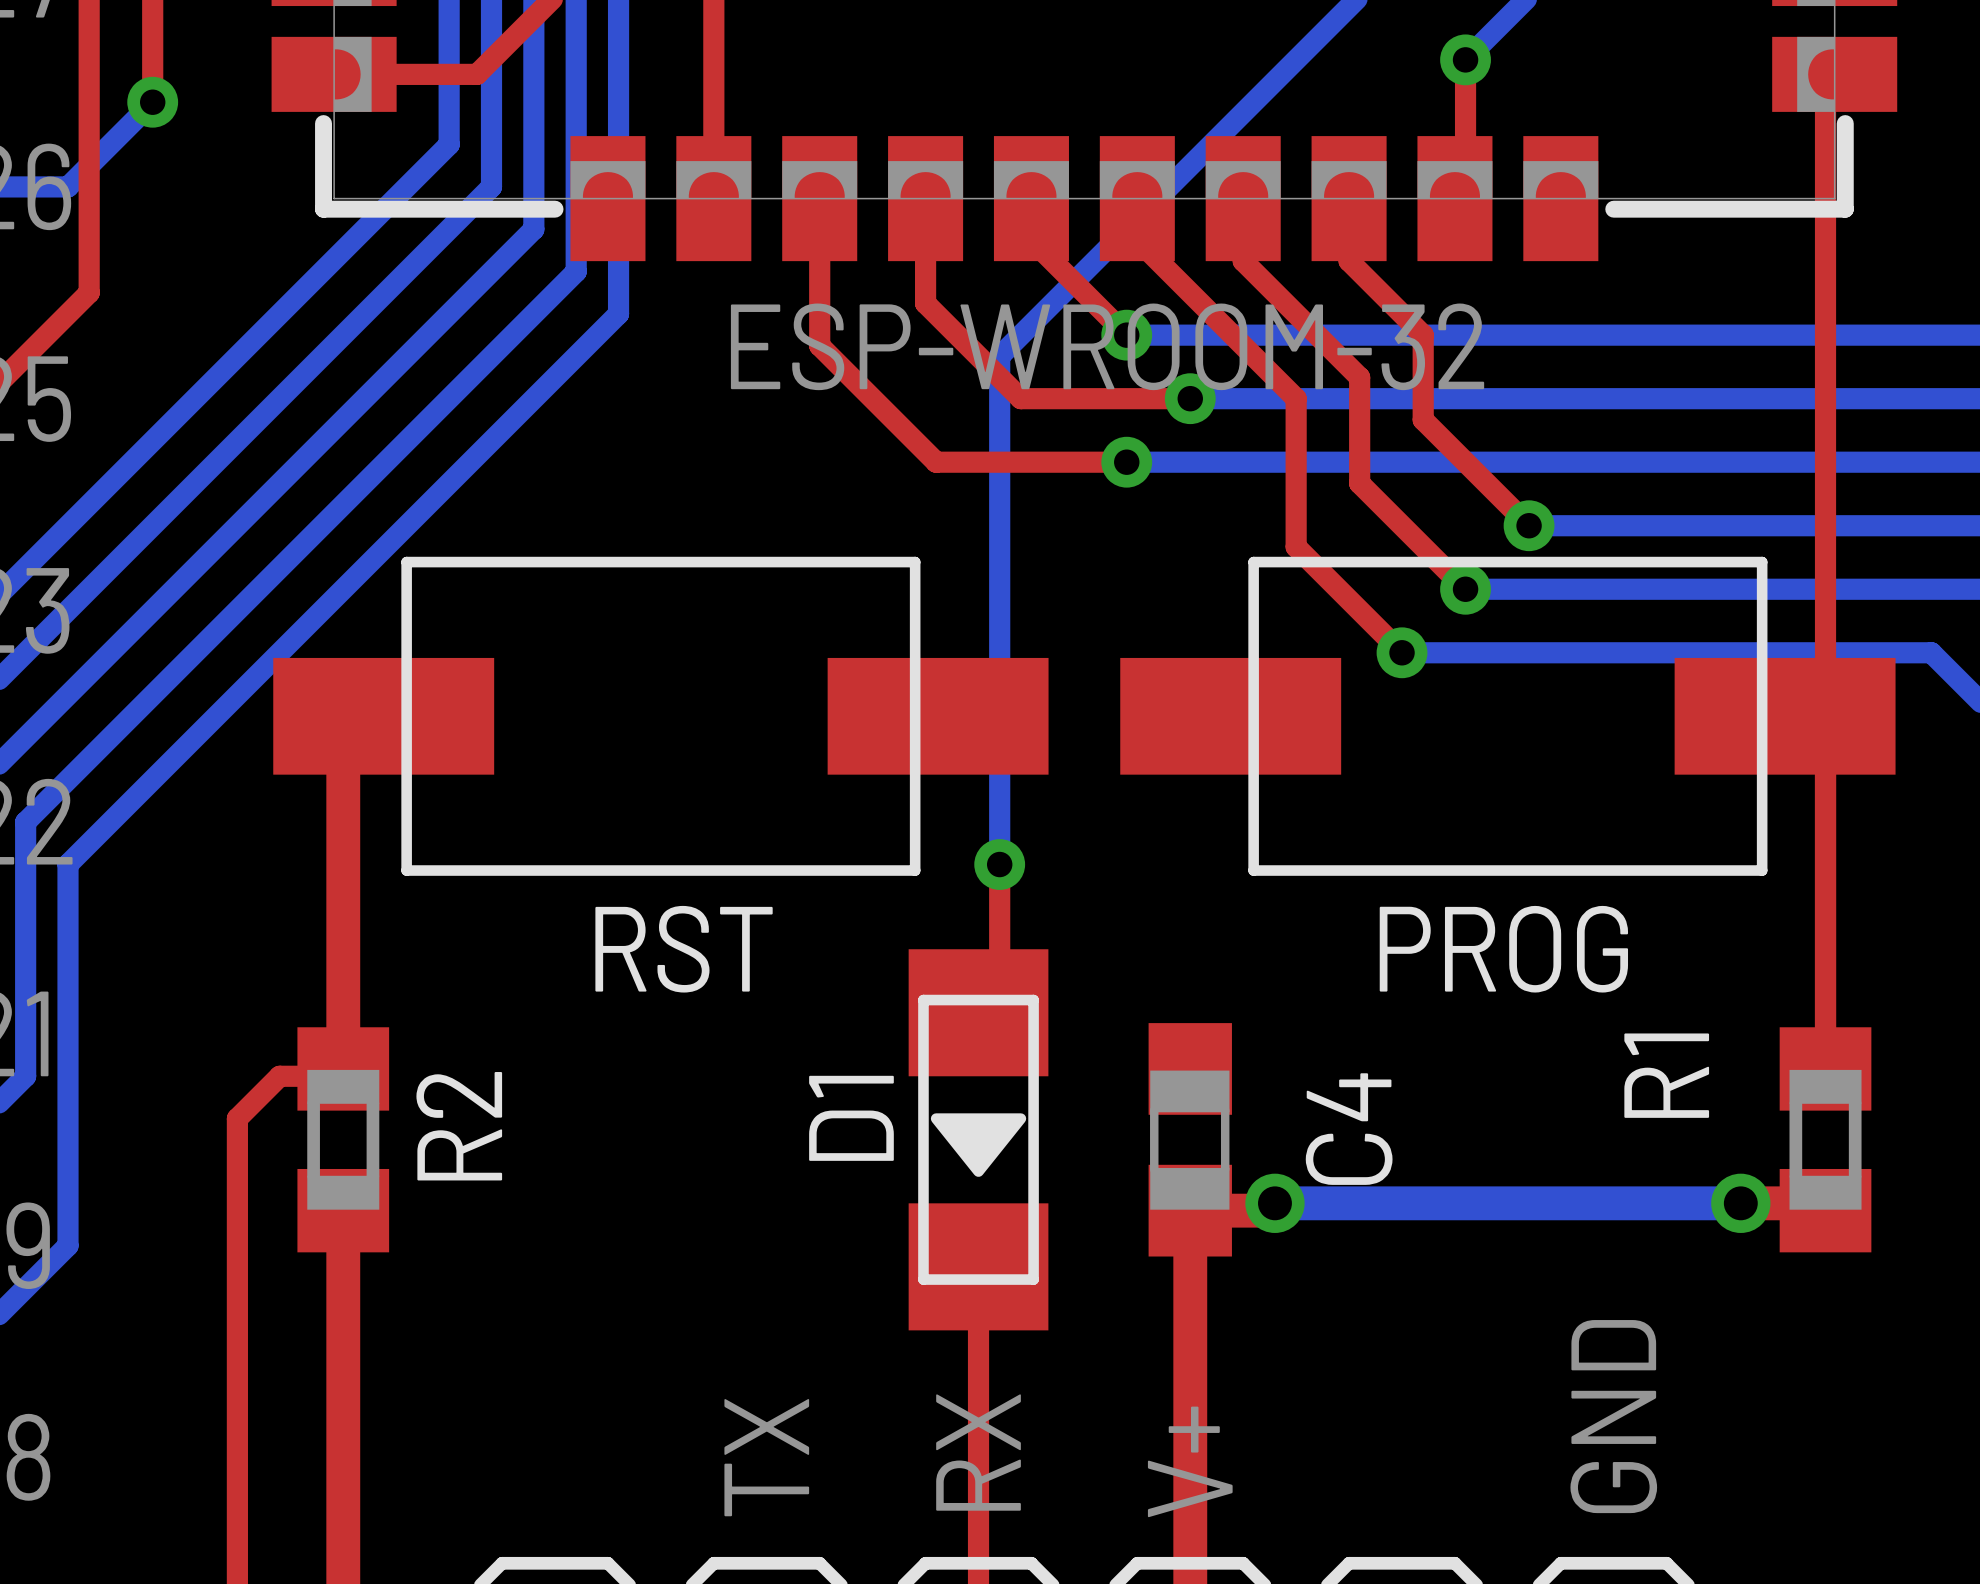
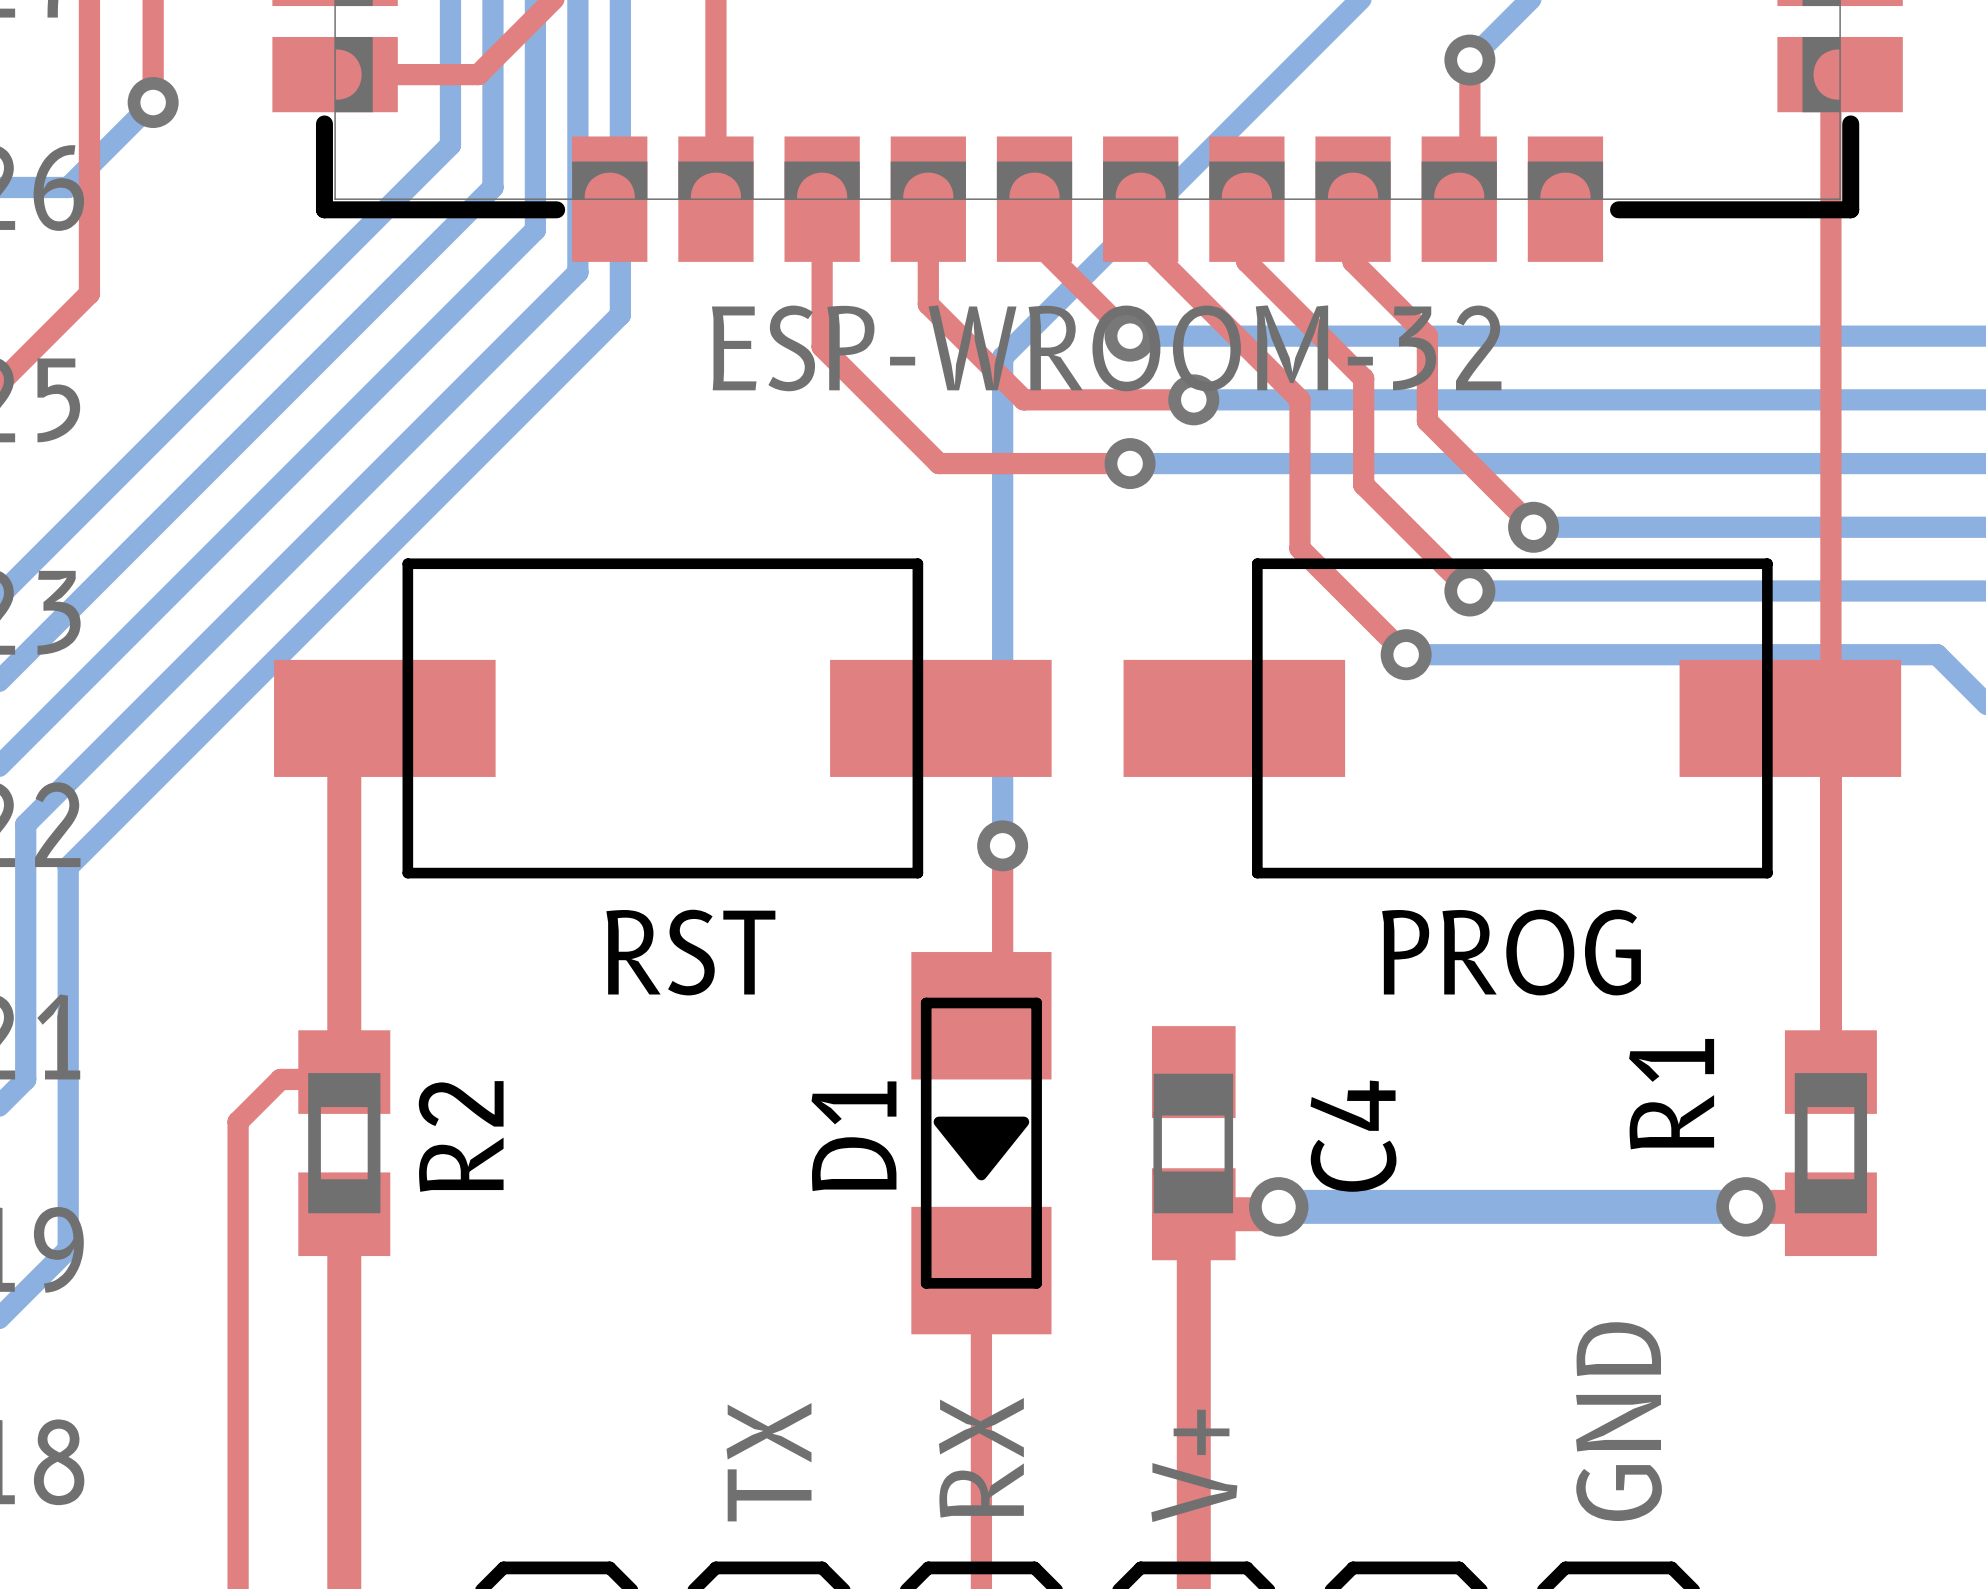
via position: (999, 864) -> (1002, 845)

